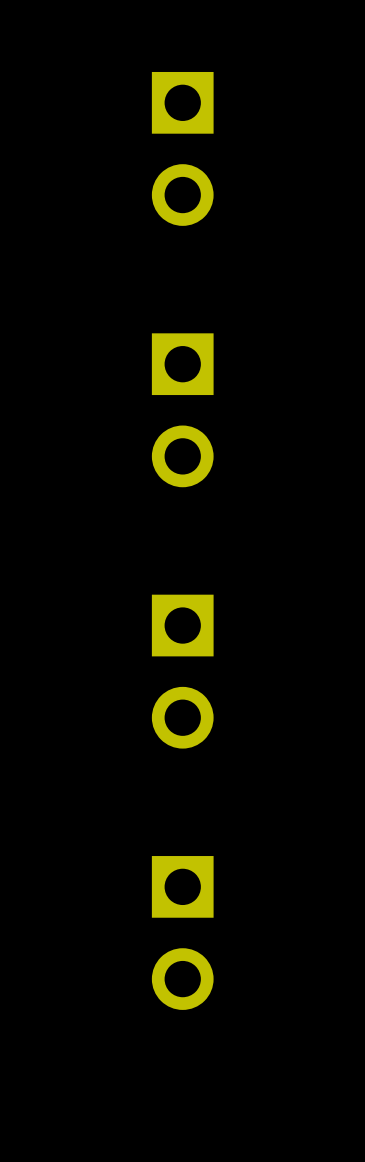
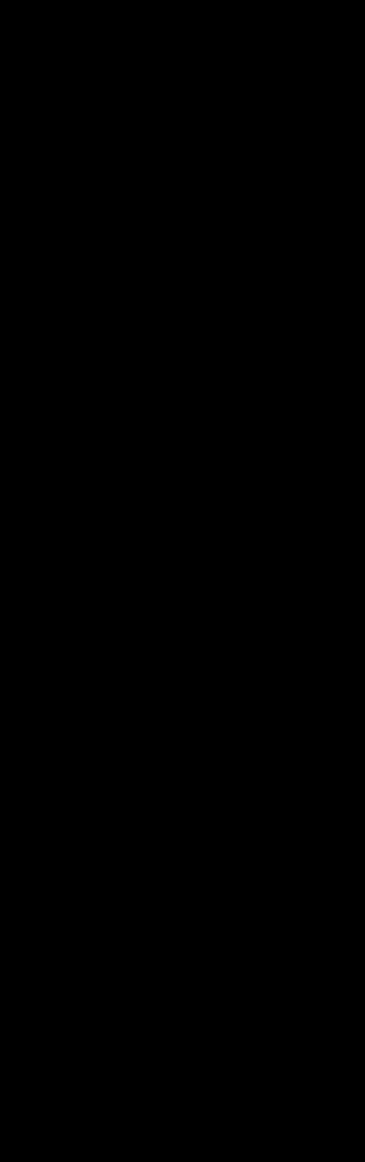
part: (182, 148) -> none
part: (182, 410) -> none
part: (182, 671) -> none
part: (182, 932) -> none

